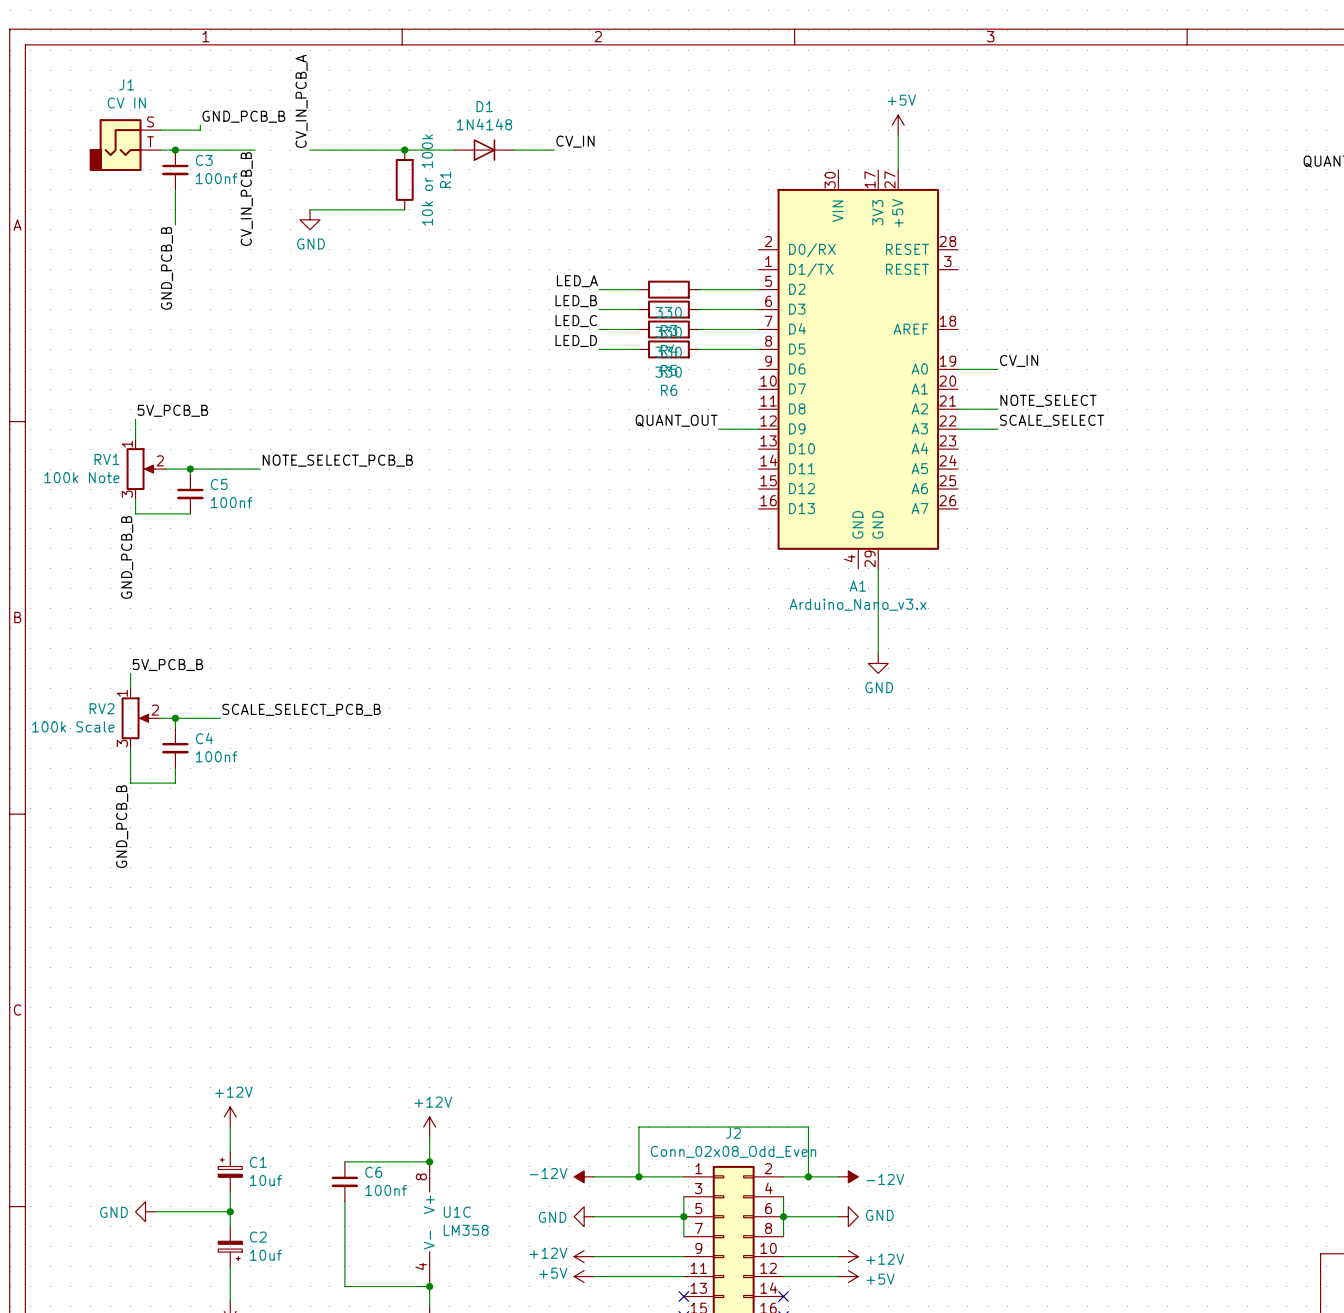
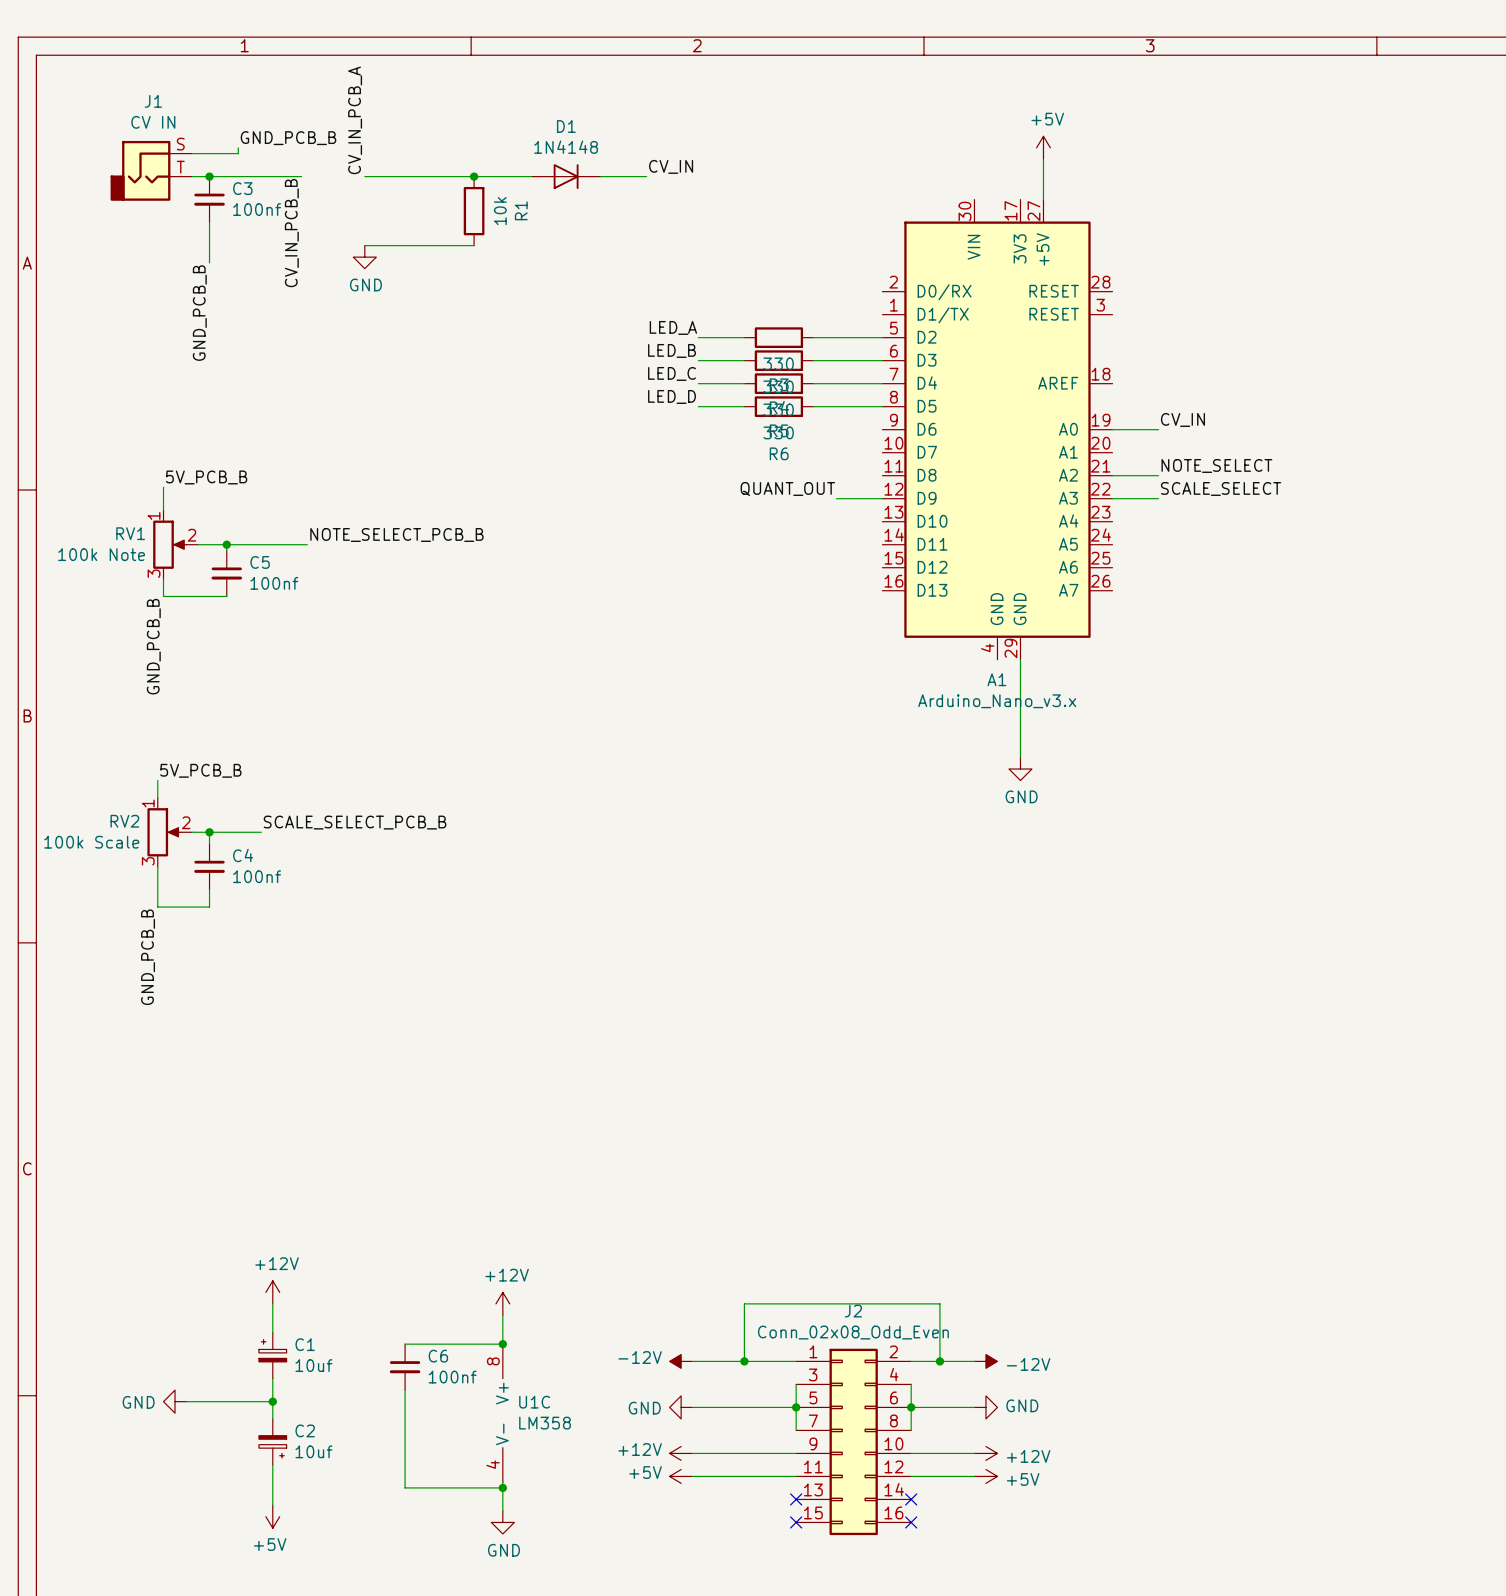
R1 value: 10k or 100k (427, 179) -> 10k (500, 211)

